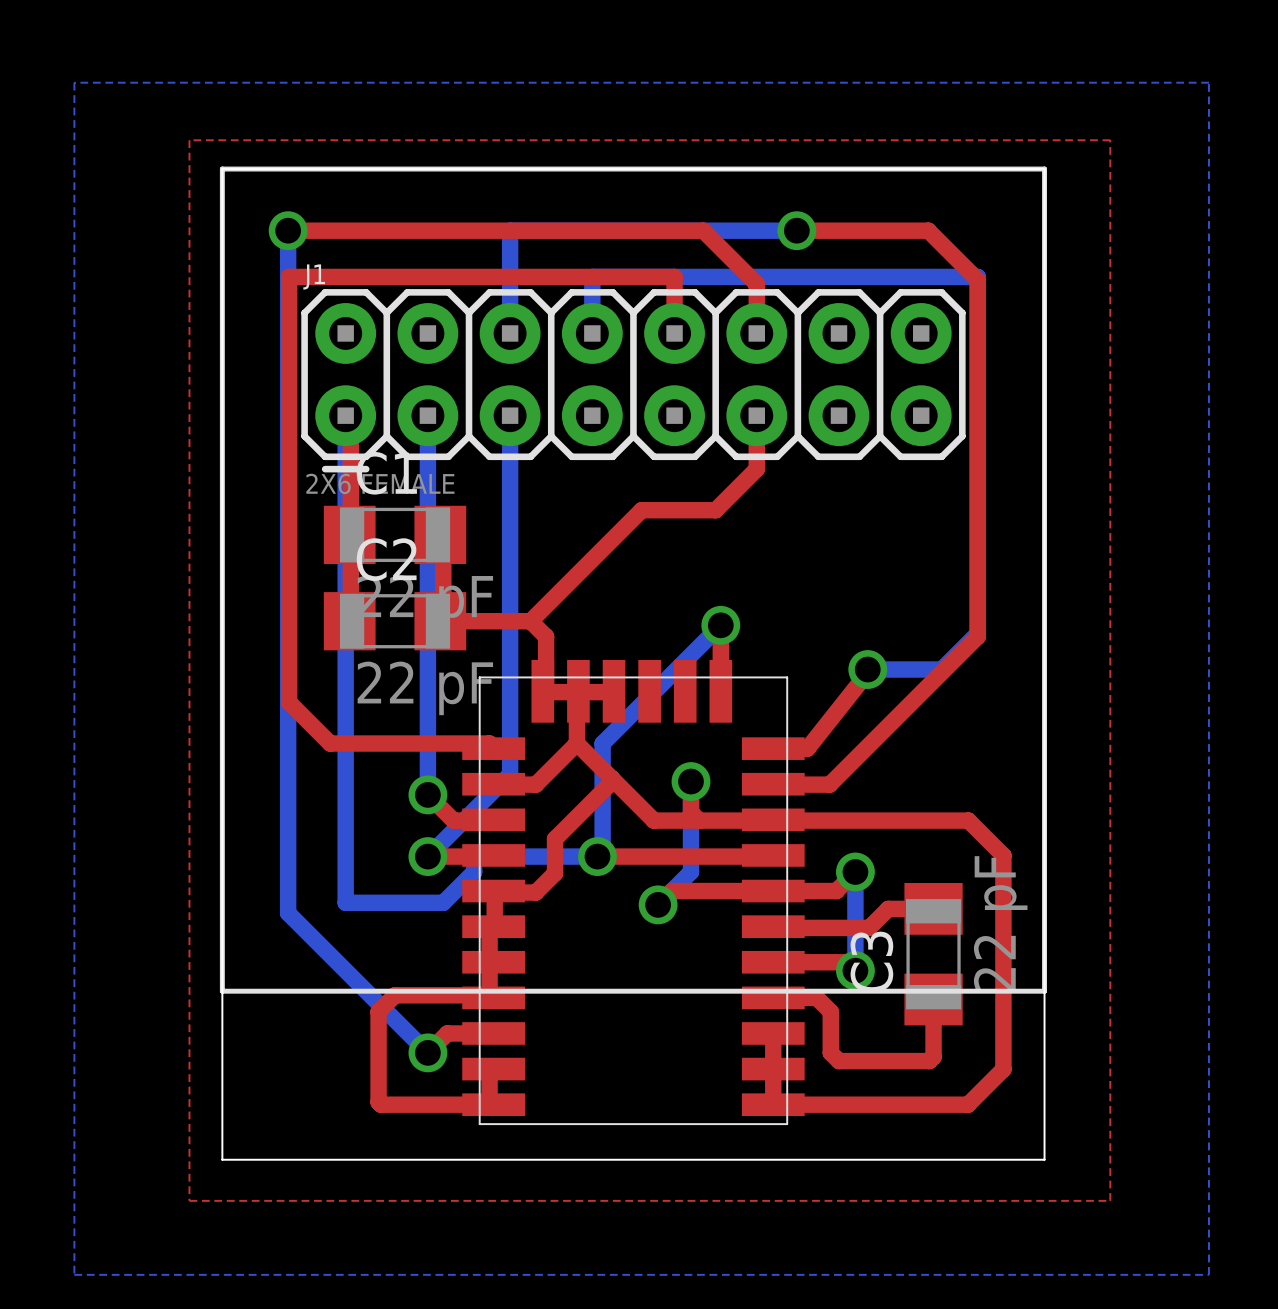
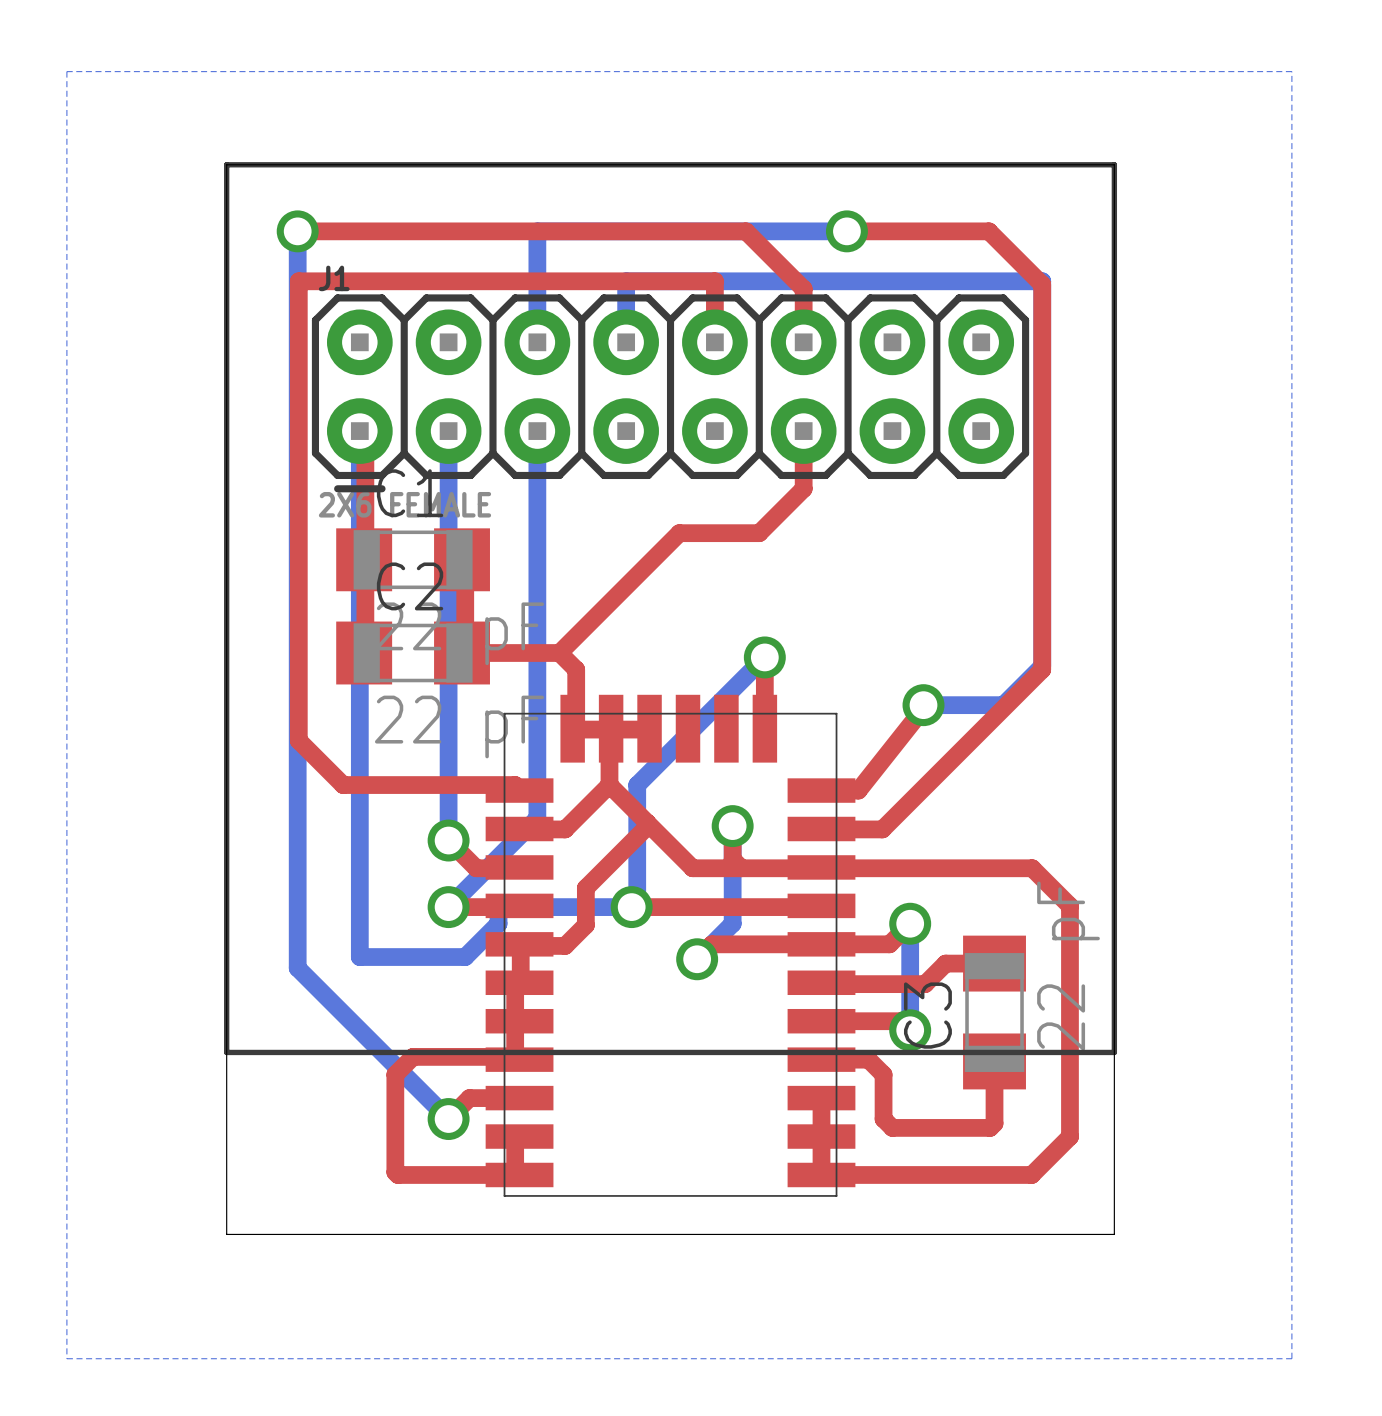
top zone outline: (189, 140) (189, 1200) (1110, 1200) (1110, 140) (189, 140) -> none

